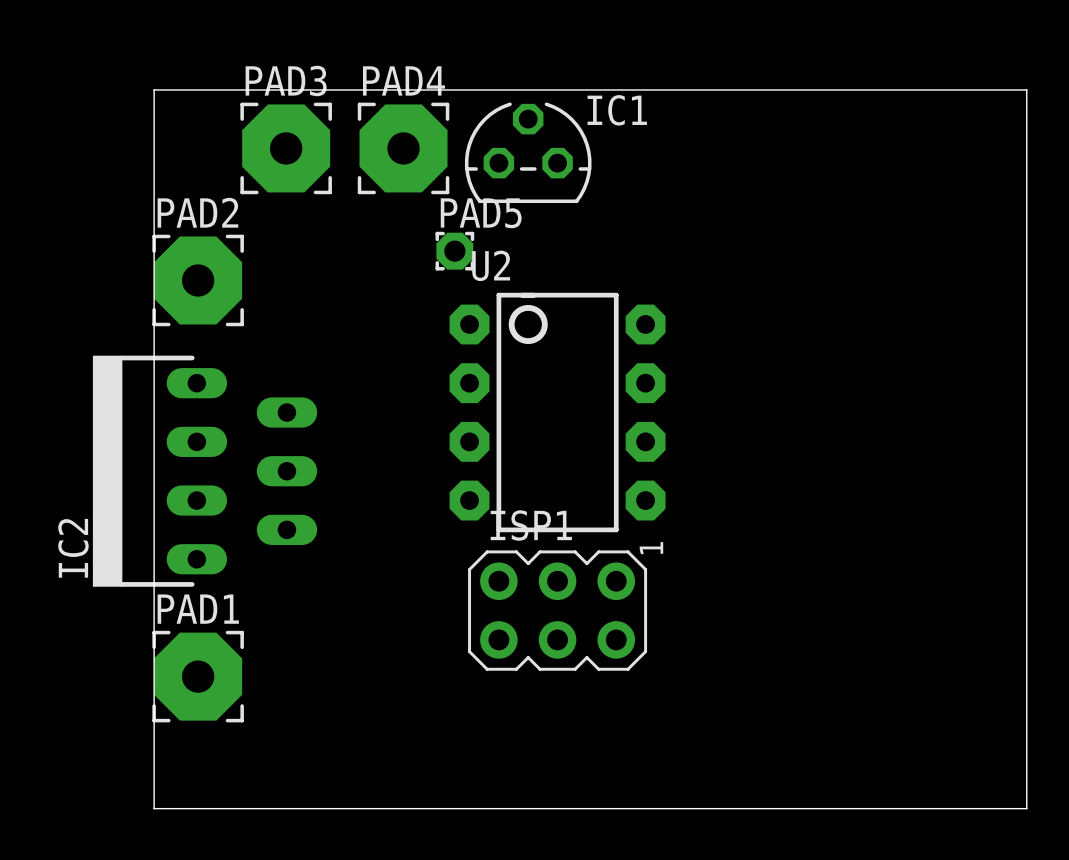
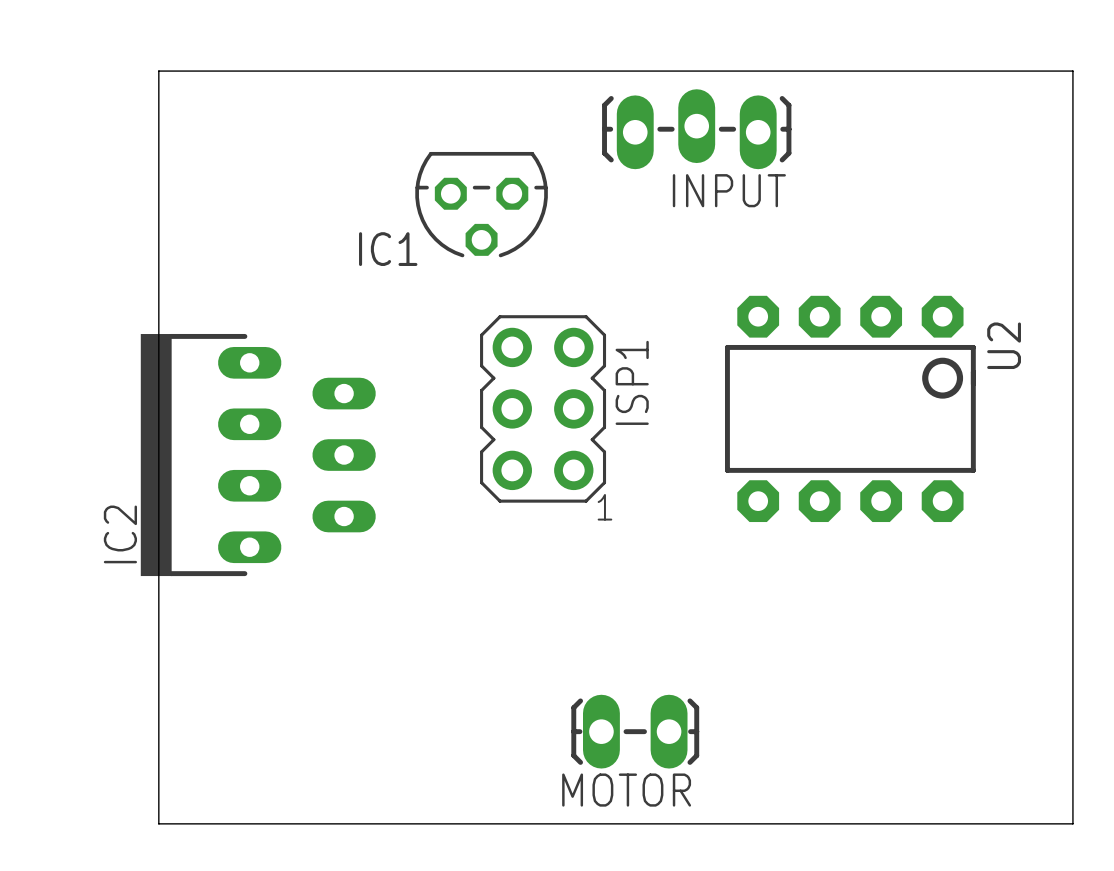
INPUT: none -> (696, 129)
PAD3: (286, 148) -> none
PAD4: (403, 148) -> none
IC1 rotation: 0° (528, 152) -> 180° (481, 204)
IC1 position: (528, 152) -> (481, 204)
PAD5: (454, 251) -> none
PAD2: (198, 280) -> none
U2 rotation: 0° (557, 412) -> 90° clockwise (850, 408)
U2 position: (557, 412) -> (850, 408)
IC2 position: (205, 471) -> (258, 455)
ISP1 rotation: 0° (557, 610) -> 90° clockwise (543, 408)
ISP1 position: (557, 610) -> (543, 408)
PAD1: (198, 676) -> none
MOTOR: none -> (635, 731)

